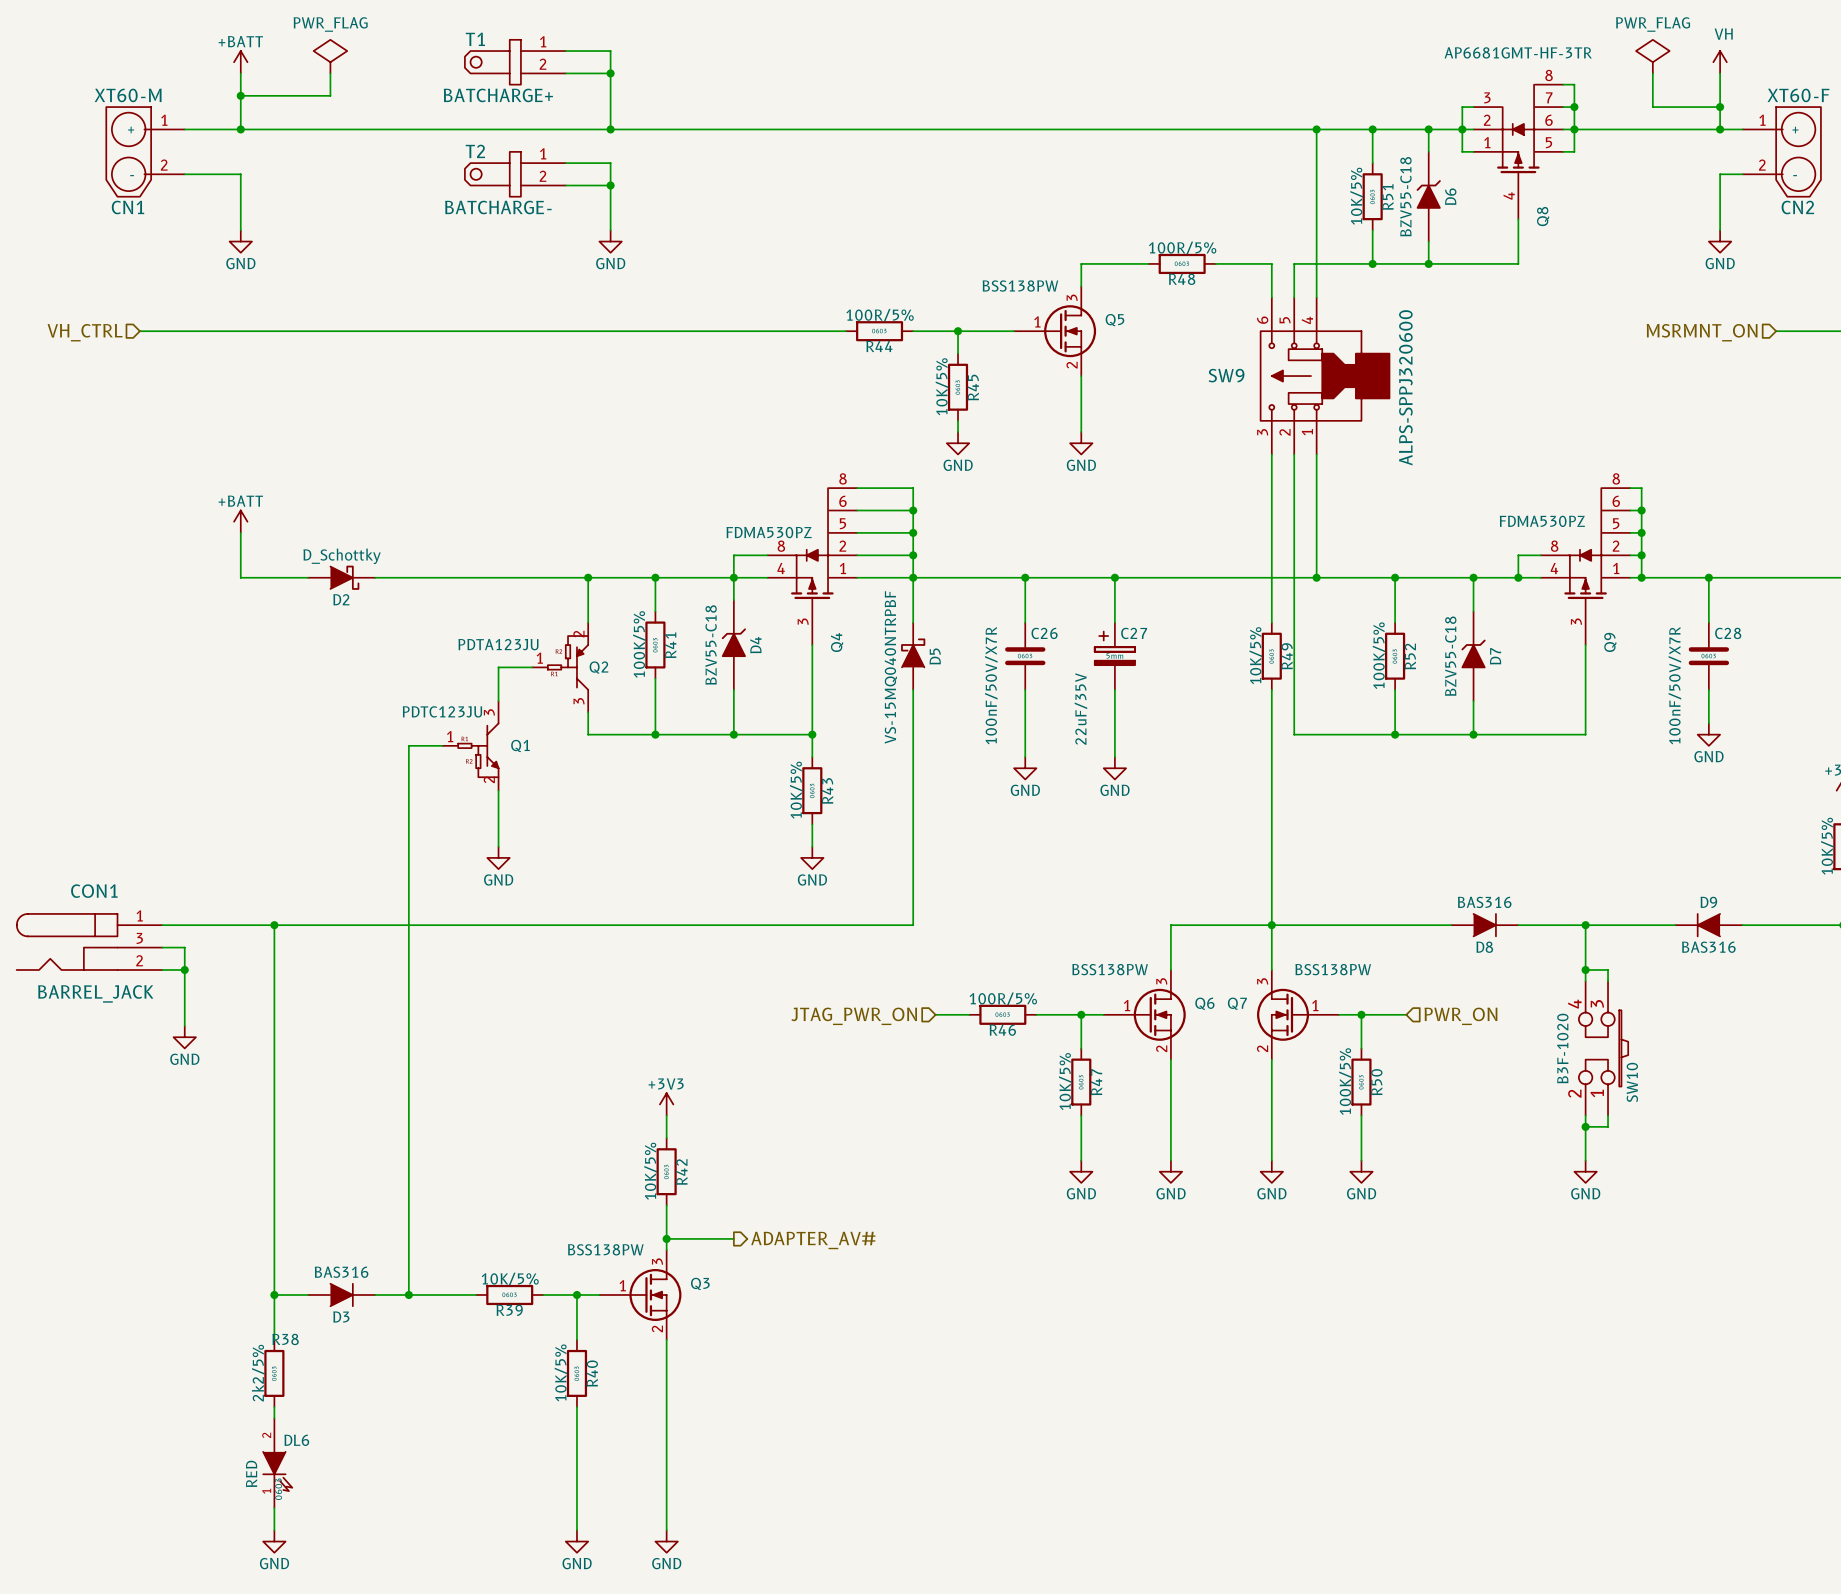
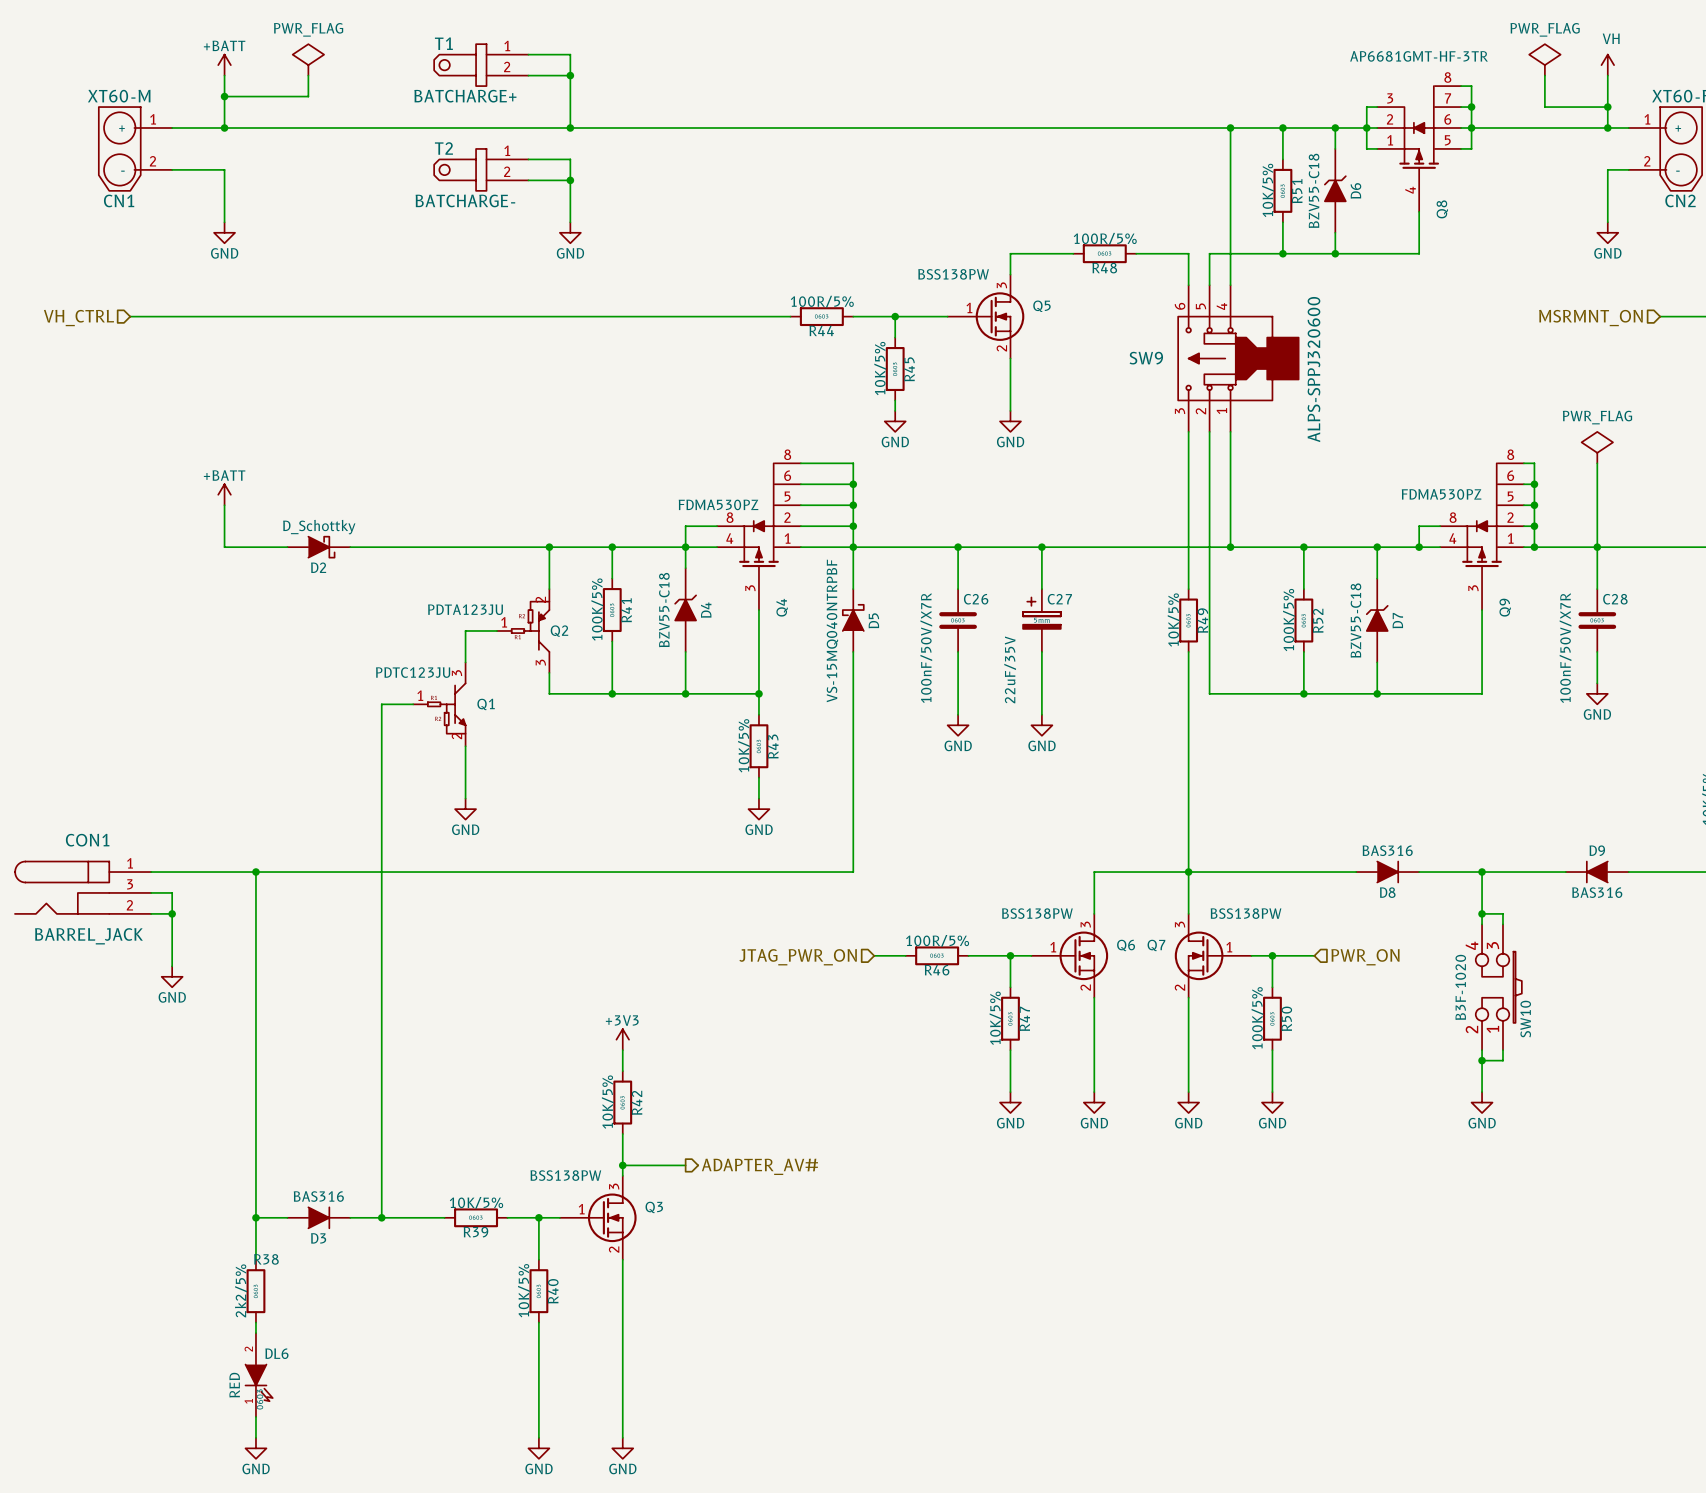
power symbol: none -> PWR_FLAG (1597, 447)
wire: none -> (1597, 463) (1597, 547)

